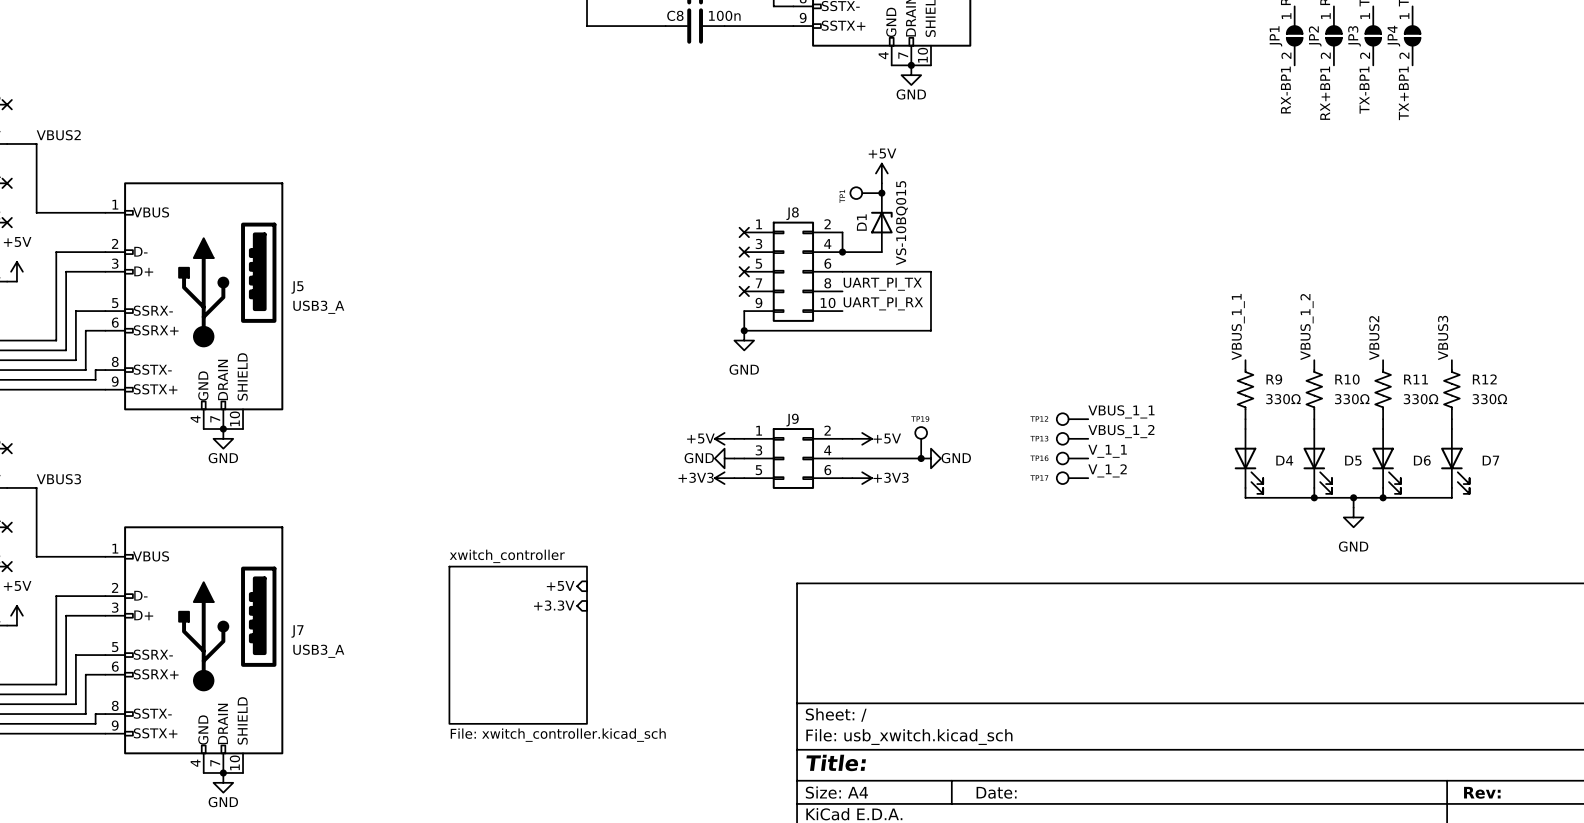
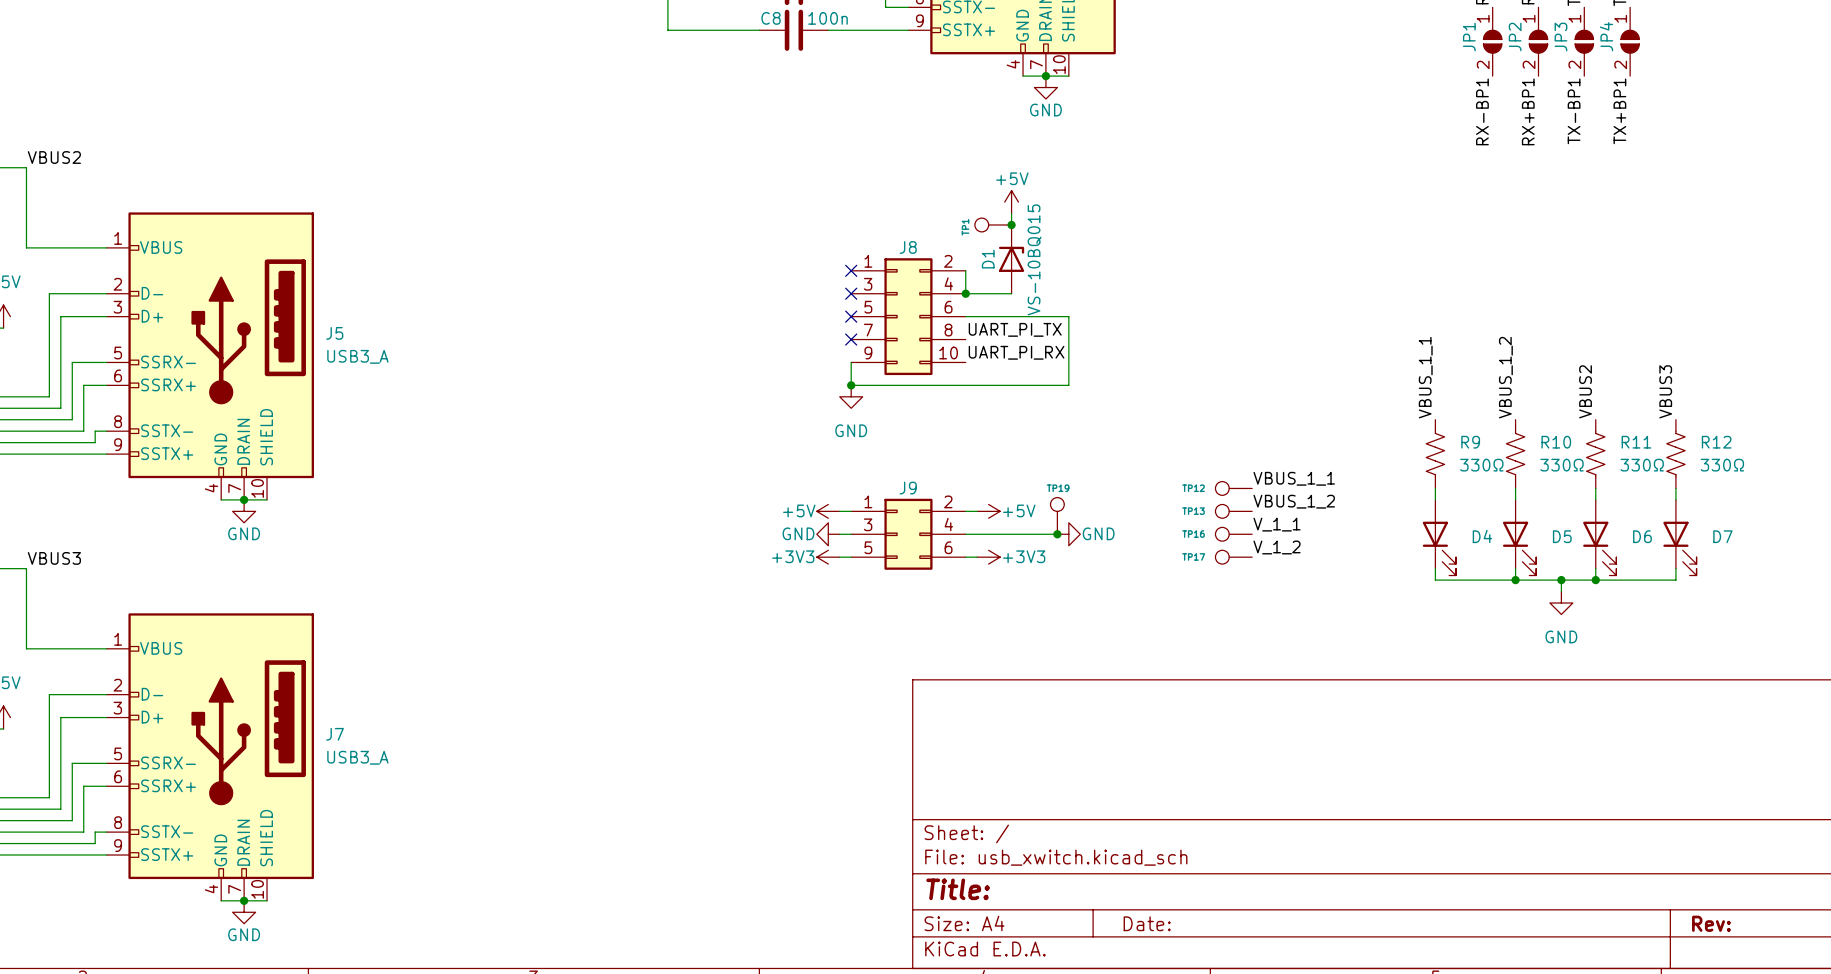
sheet pin: +5V (560, 585) -> none
sheet pin: +3.3V (554, 605) -> none
sheet xwitch_controller: File: xwitch_controller.kicad_sch (518, 645) -> none

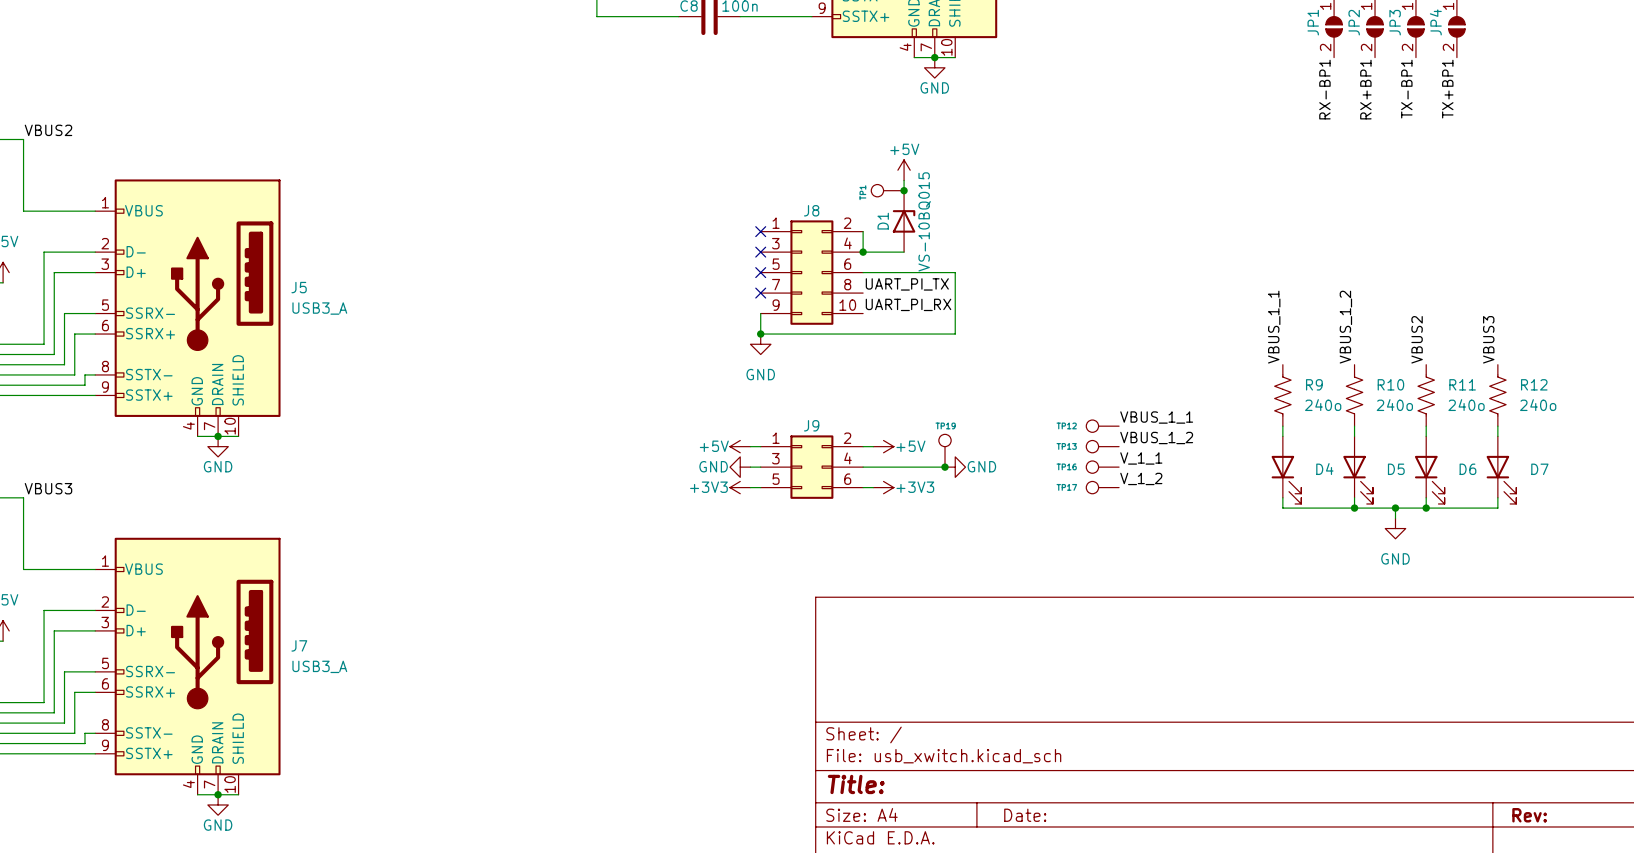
R9 value: 330Ω (1481, 465) -> 240o (1323, 405)
R10 value: 330Ω (1562, 465) -> 240o (1394, 405)
R11 value: 330Ω (1642, 465) -> 240o (1466, 405)
R12 value: 330Ω (1722, 465) -> 240o (1538, 405)

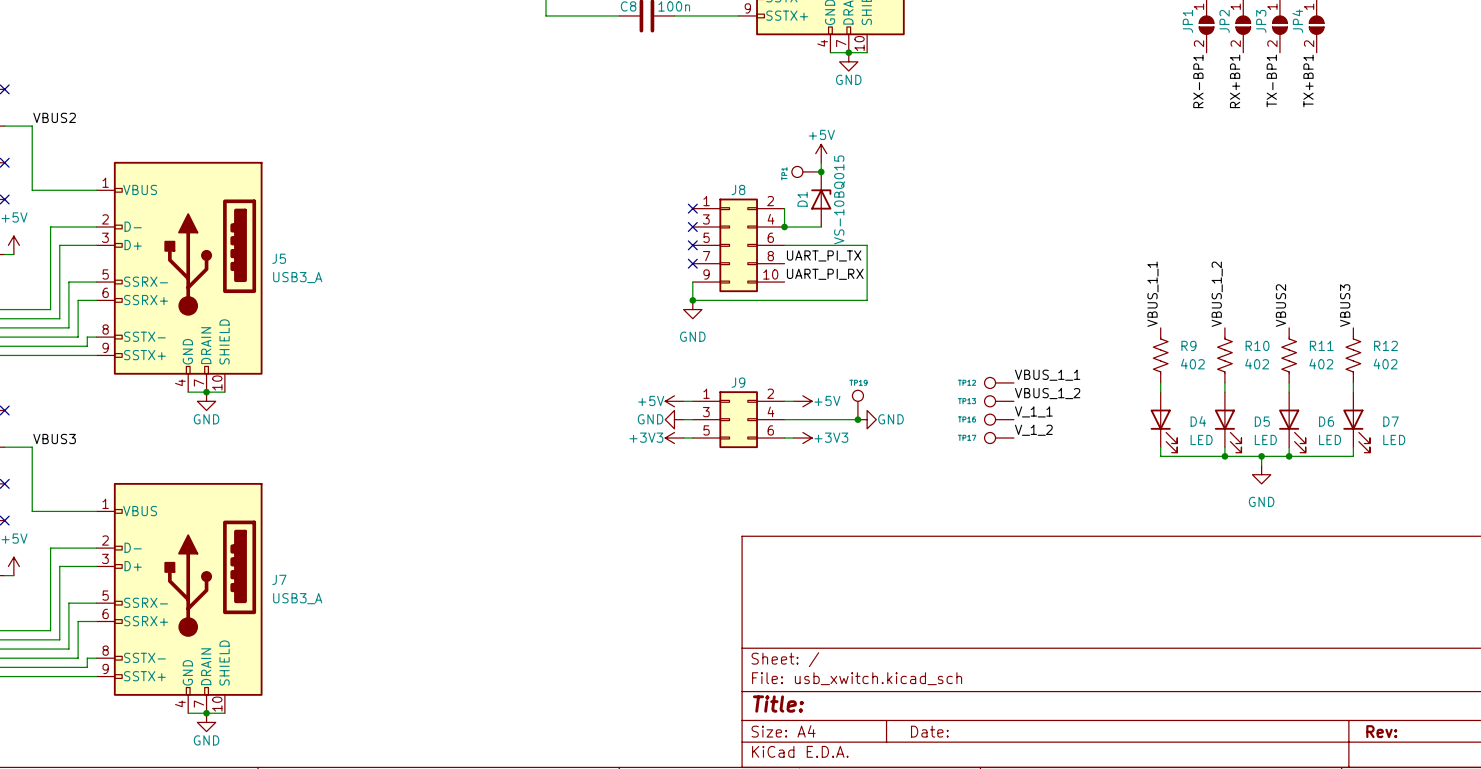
R9 value: 240o (1323, 405) -> 402 (1192, 364)
R10 value: 240o (1394, 405) -> 402 (1257, 364)
R11 value: 240o (1466, 405) -> 402 (1321, 364)
R12 value: 240o (1538, 405) -> 402 (1385, 364)
D4 value: none -> LED (1201, 439)
D5 value: none -> LED (1265, 439)
D6 value: none -> LED (1330, 439)
D7 value: none -> LED (1394, 439)

